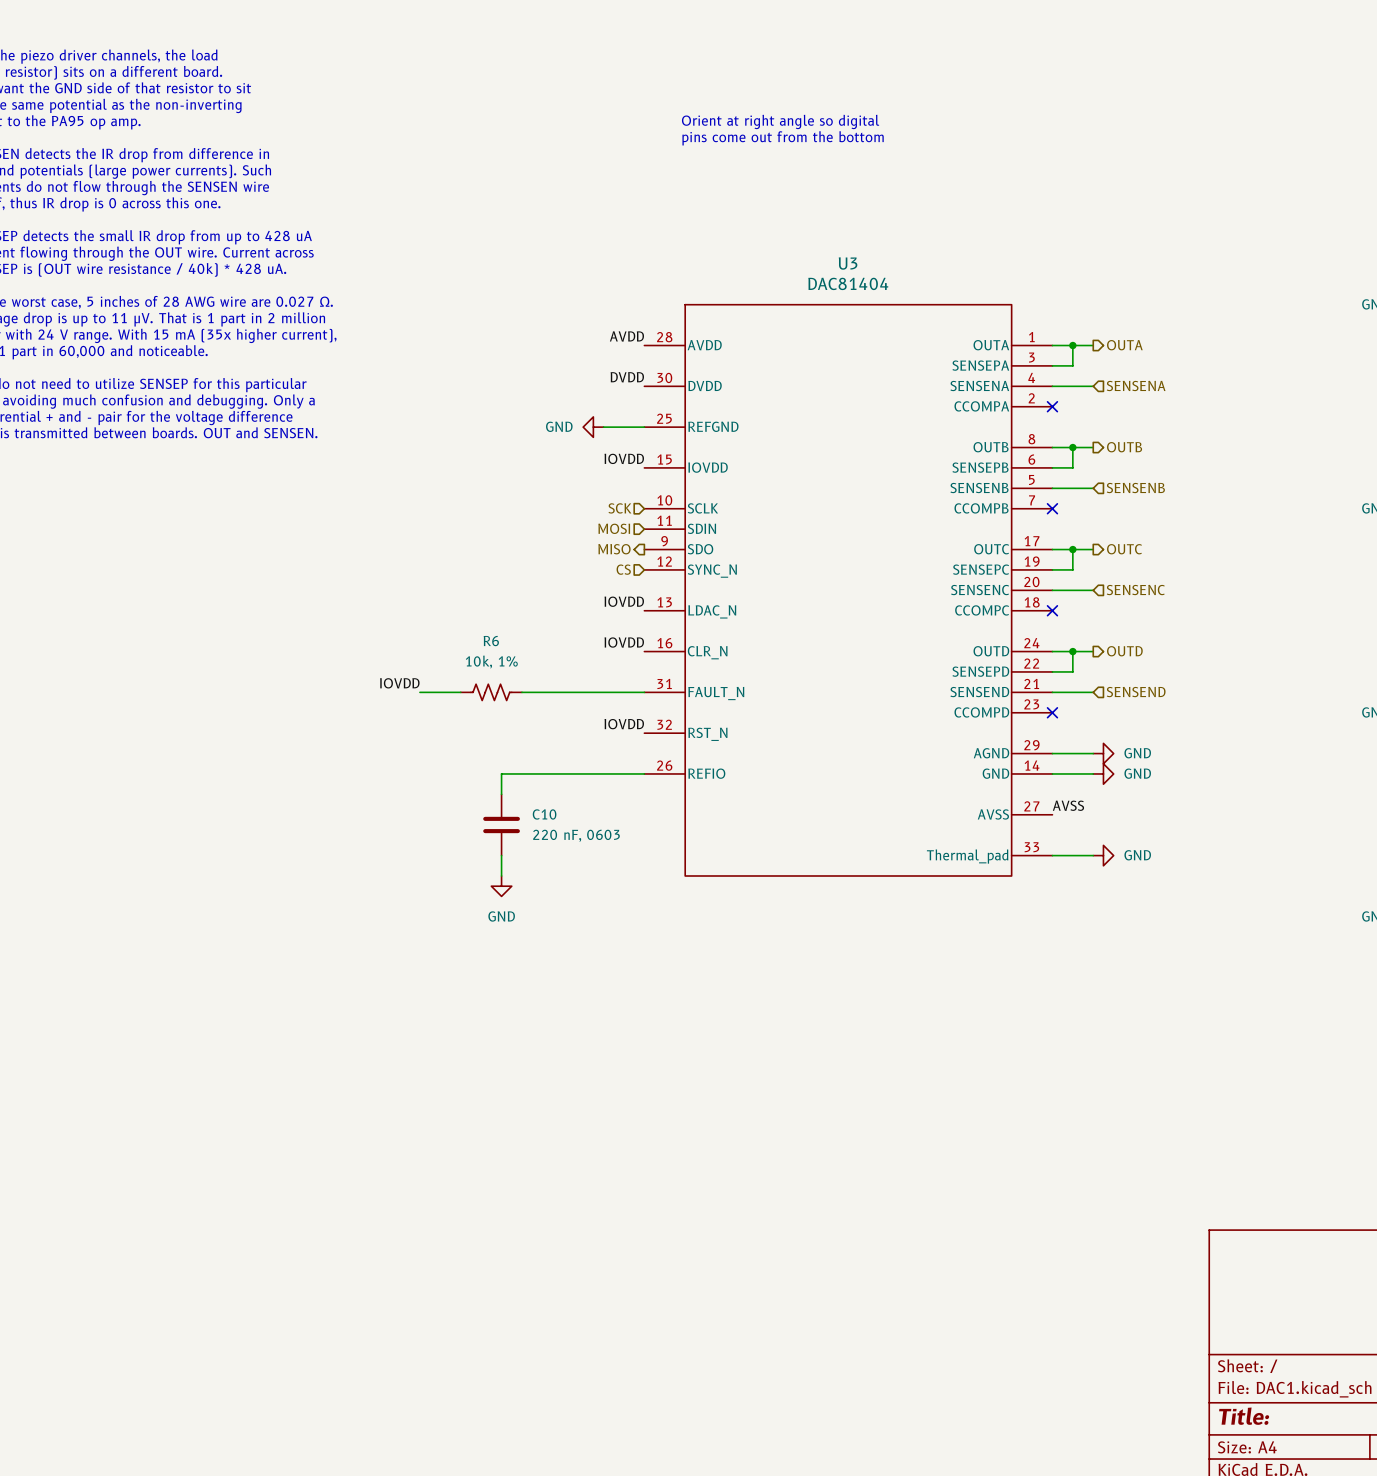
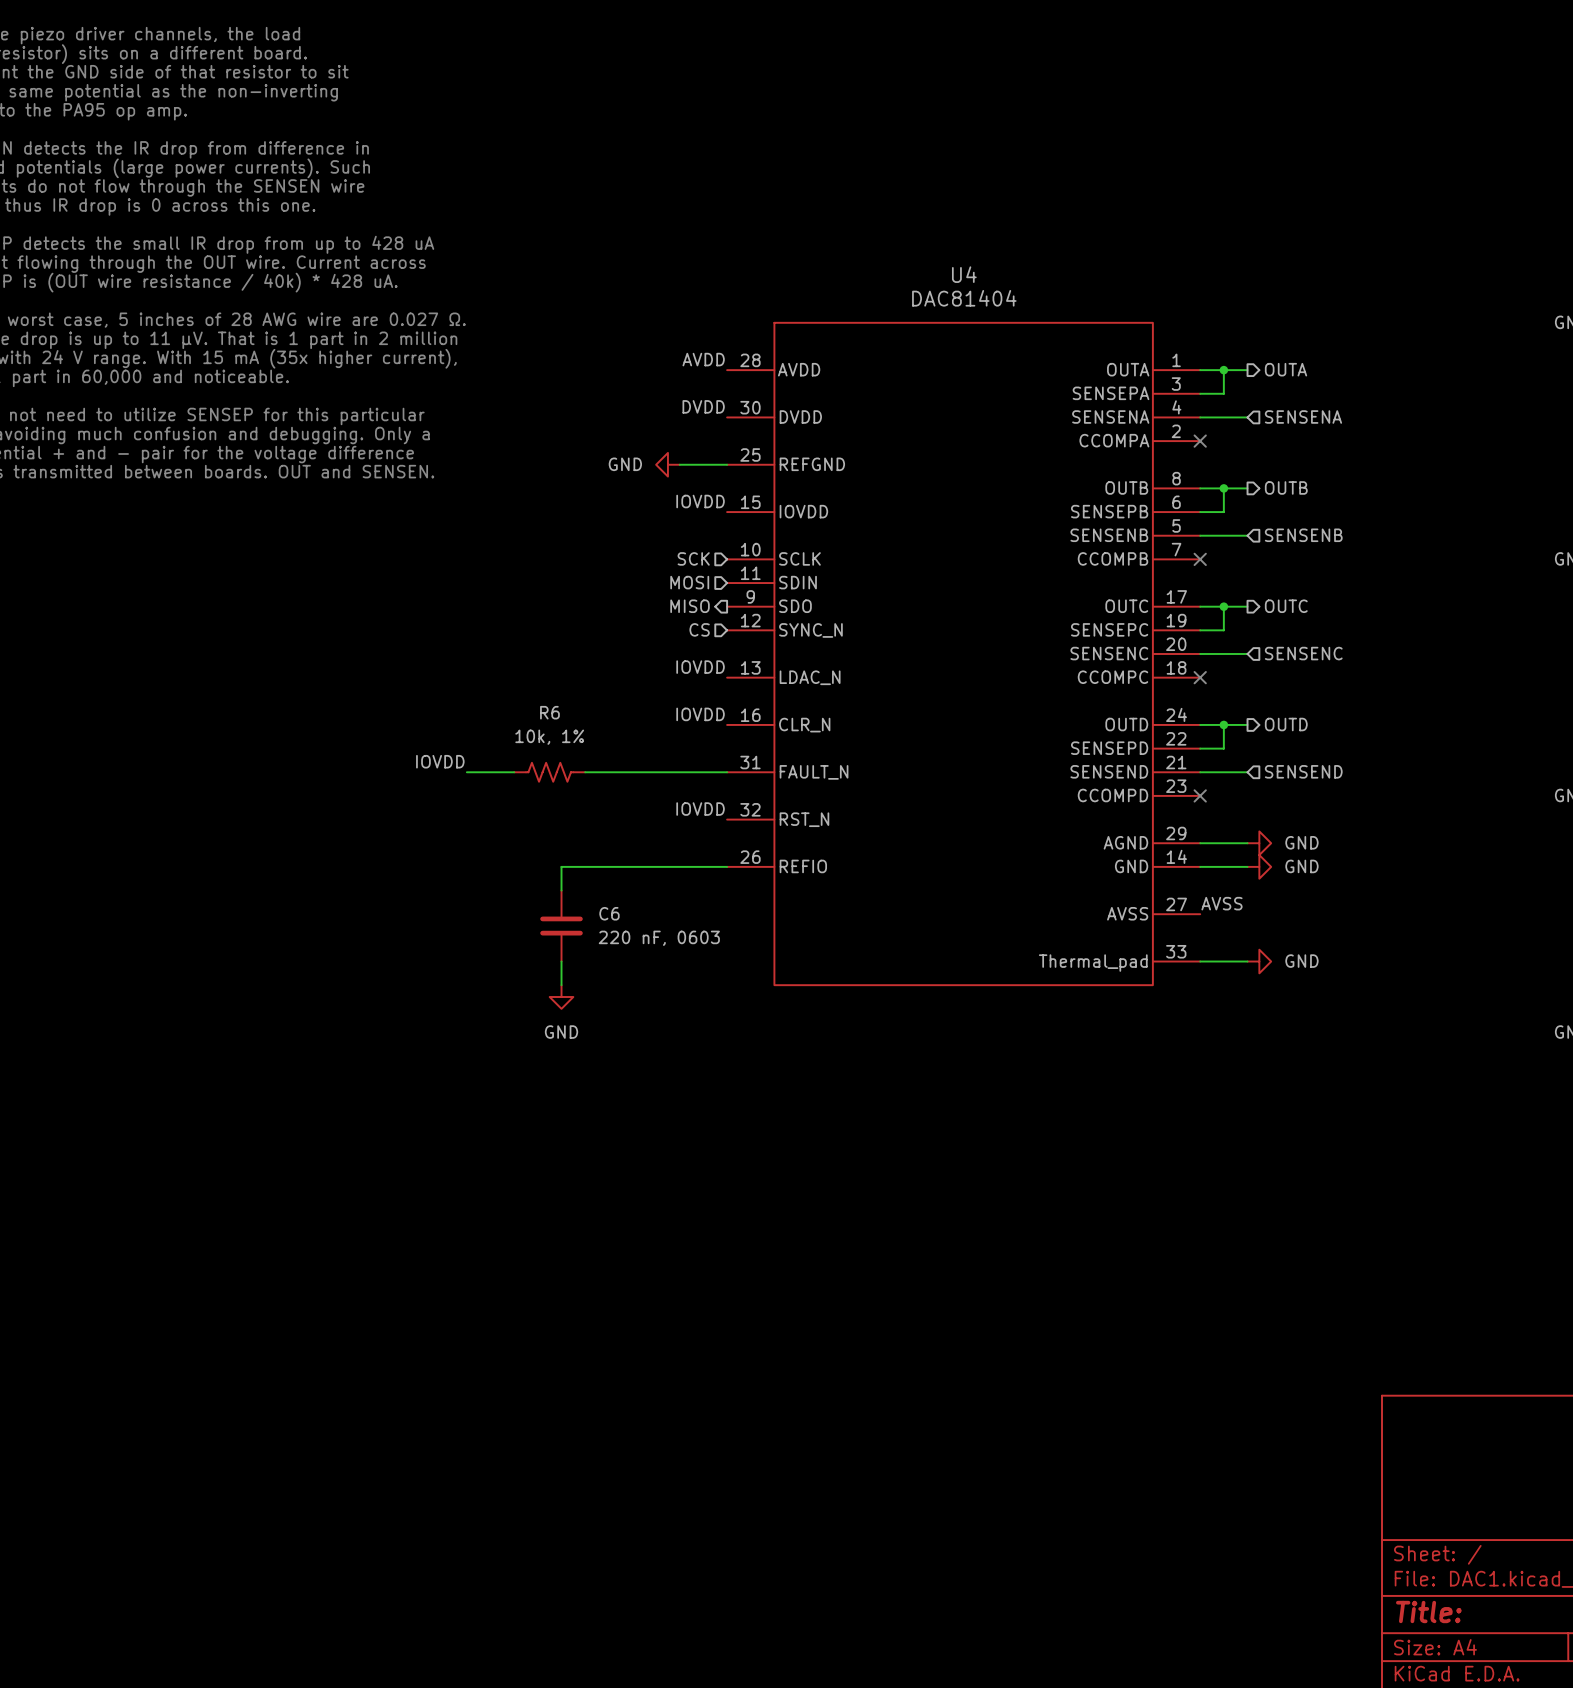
text: Orient at right angle so digital (780, 121) -> none
text: pins come out from the bottom (783, 138) -> none
U3 name: U3 (848, 263) -> U4 (964, 274)
C10 name: C10 (544, 814) -> C6 (609, 913)

